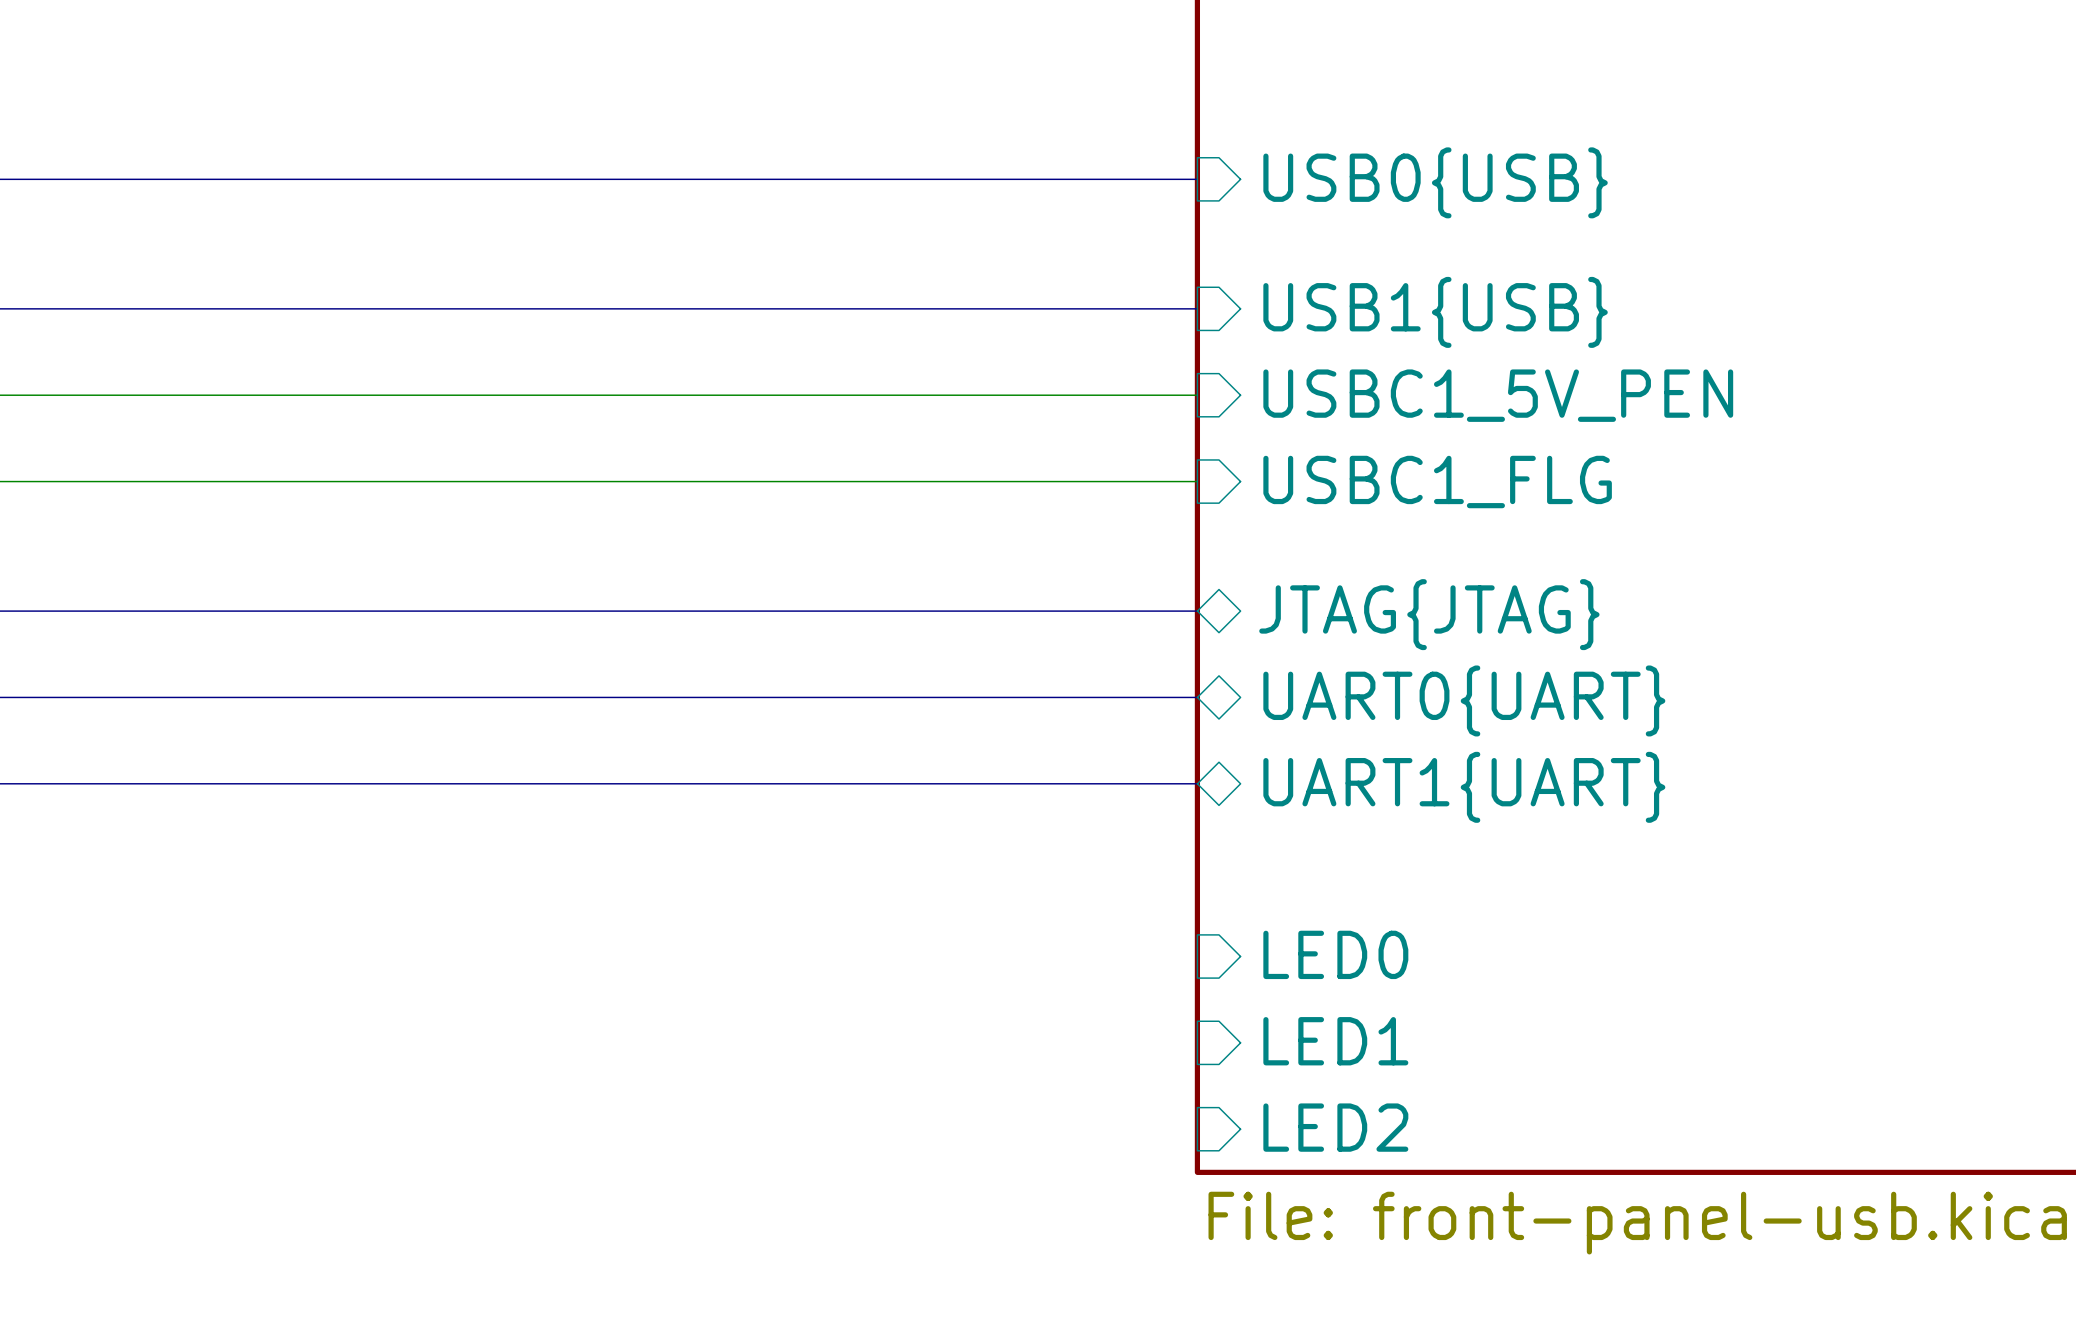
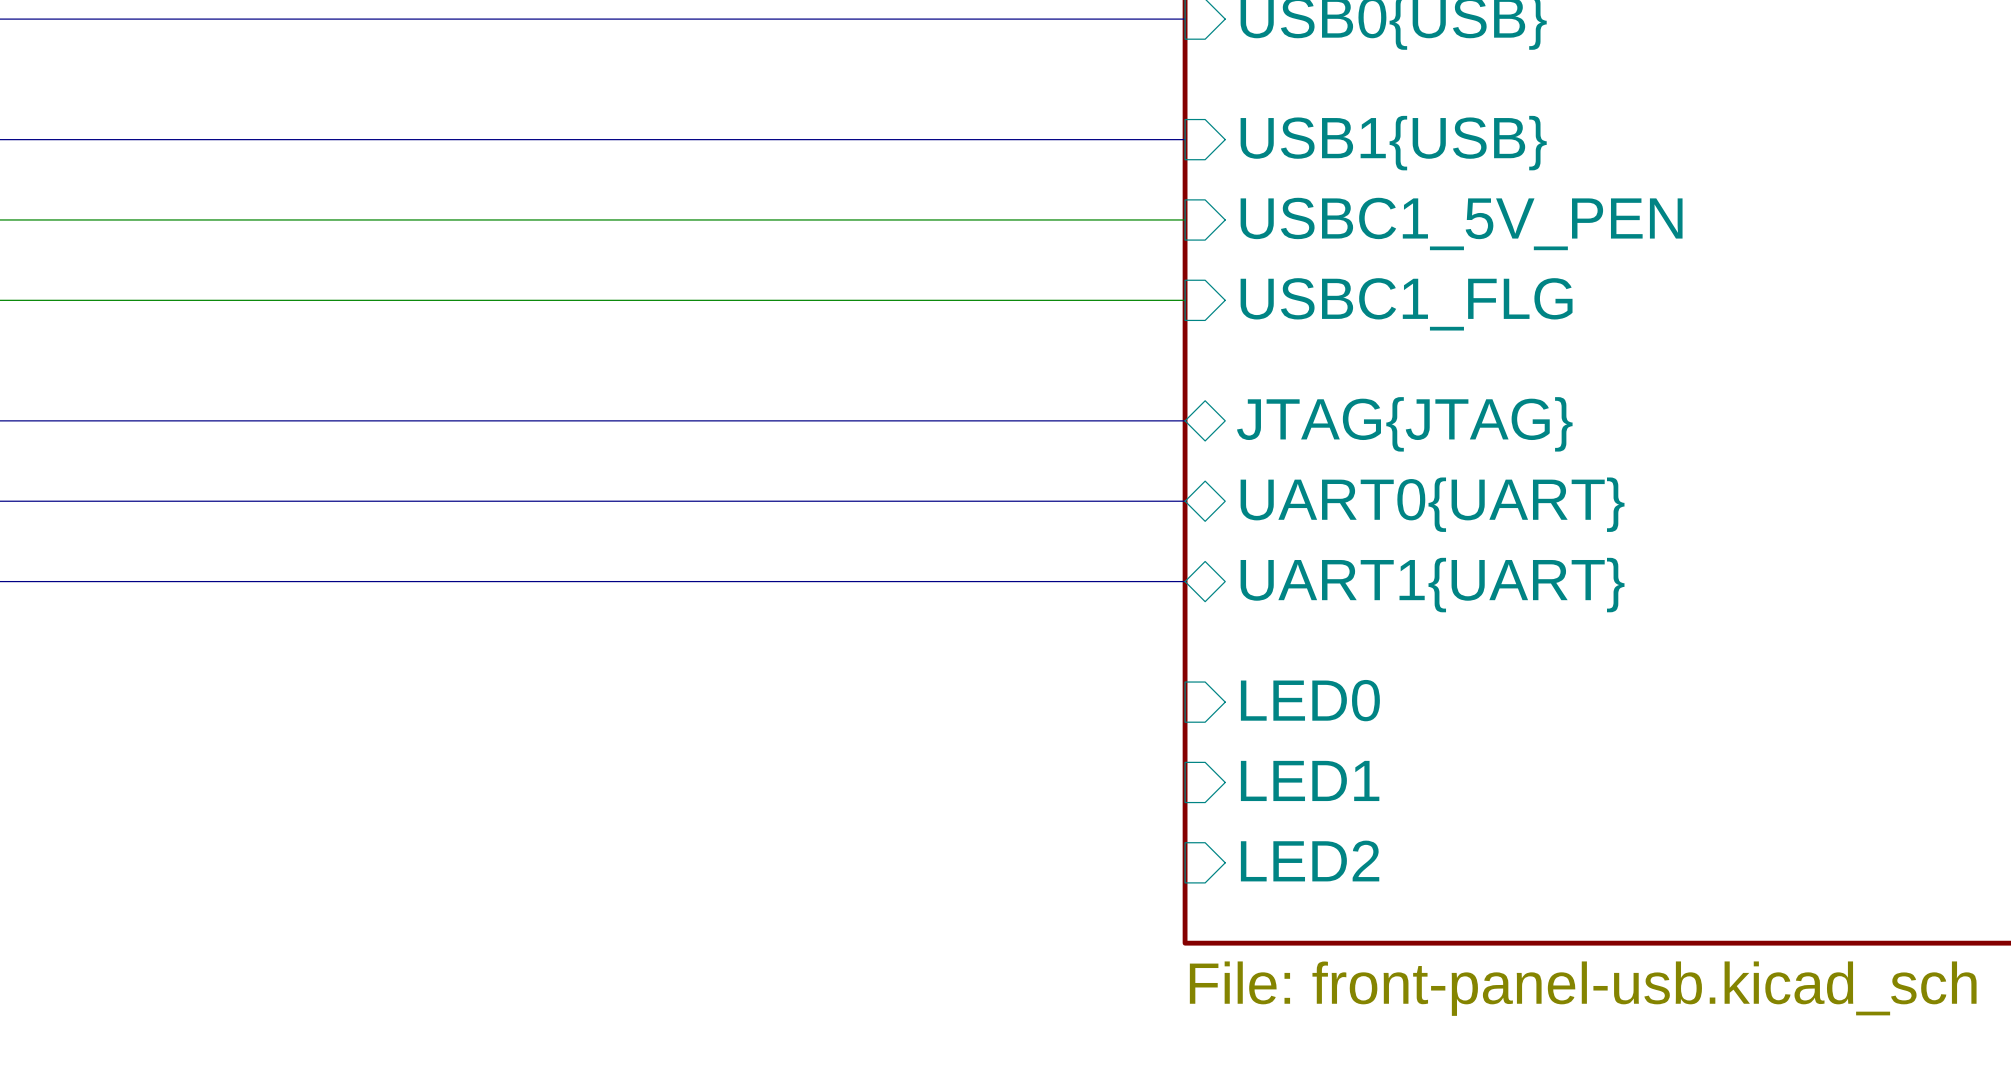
sheet pin position: LED0 (1335, 954) -> LED0 (1310, 700)
sheet pin position: LED1 (1335, 1041) -> LED1 (1310, 780)
sheet pin position: LED2 (1335, 1127) -> LED2 (1310, 861)

